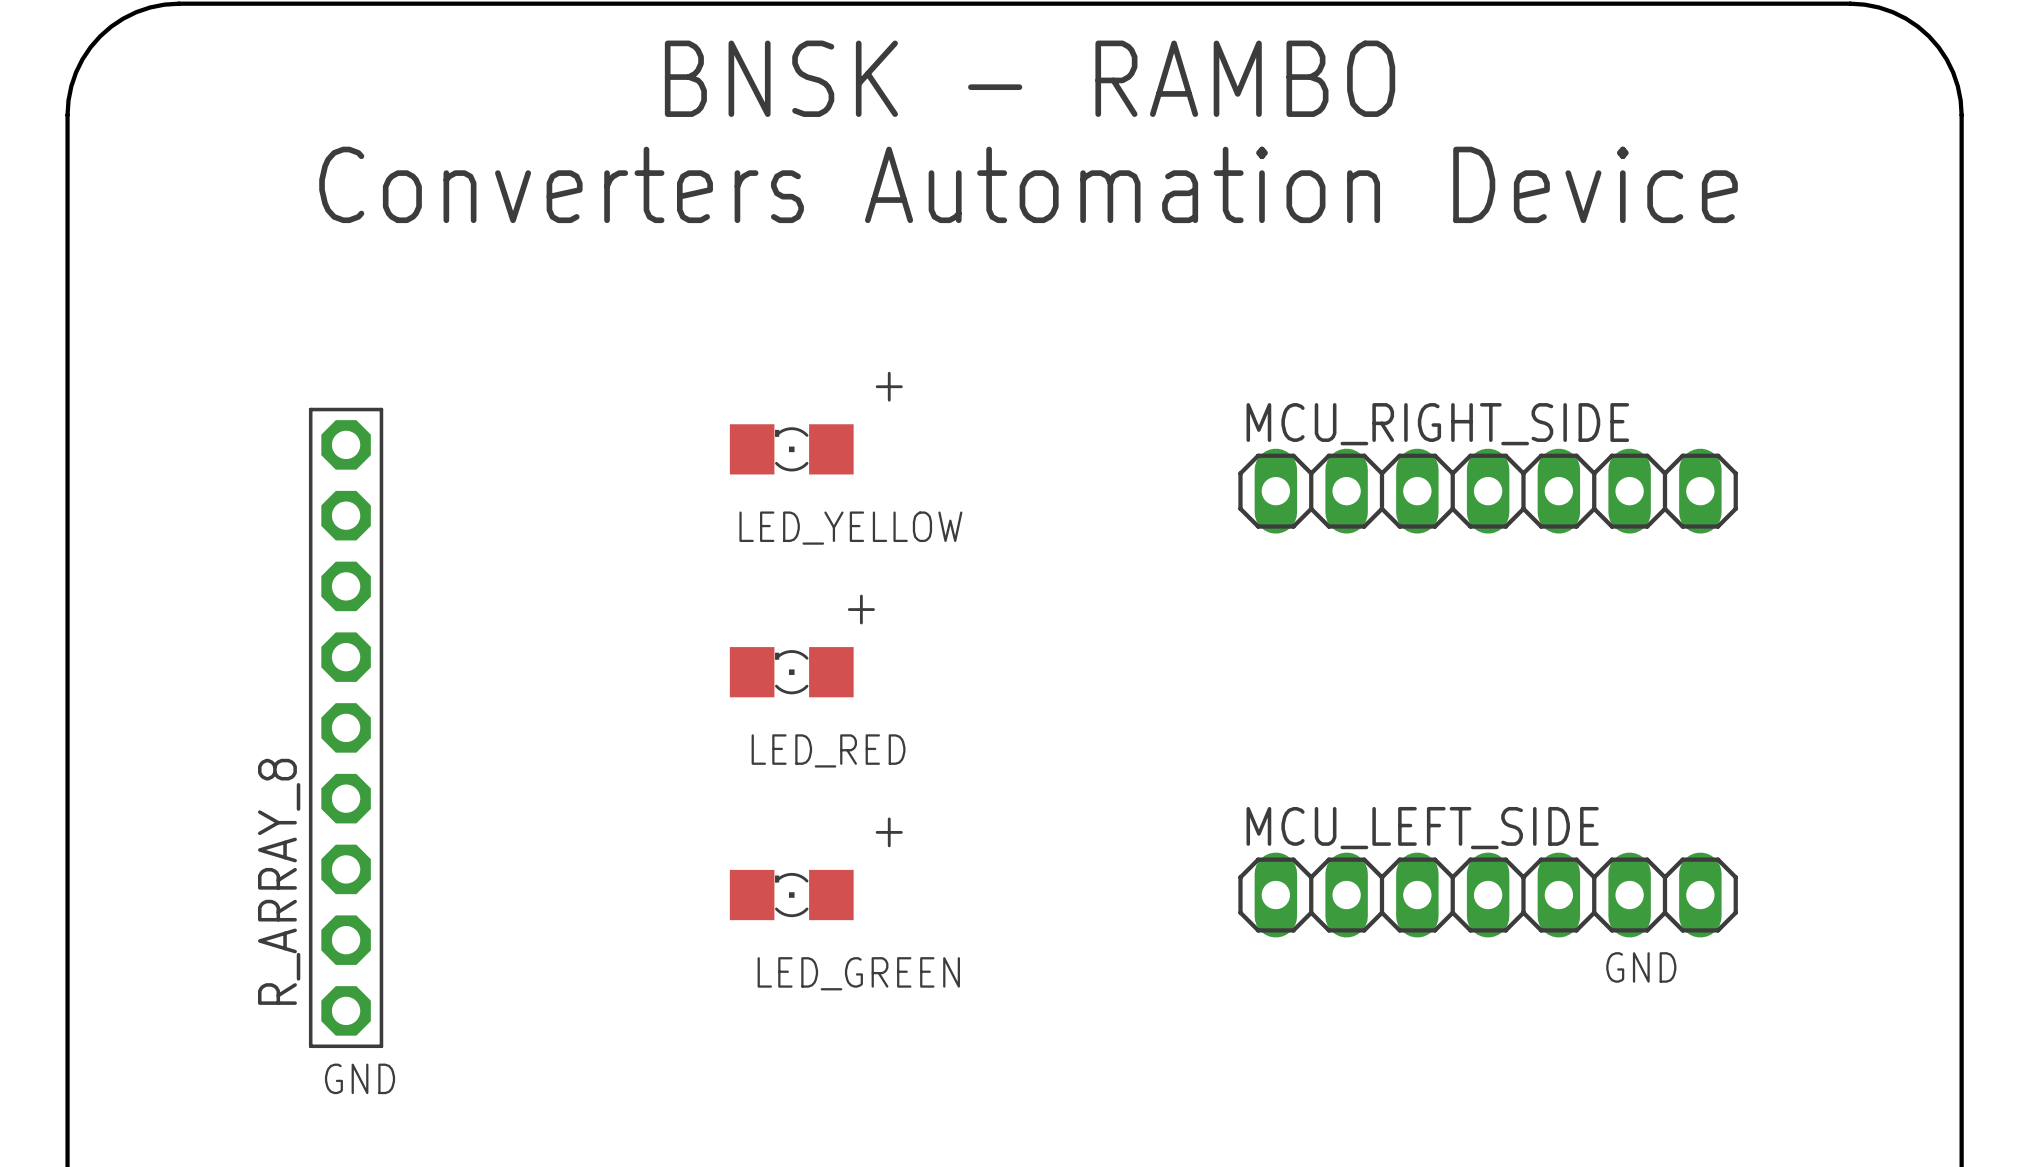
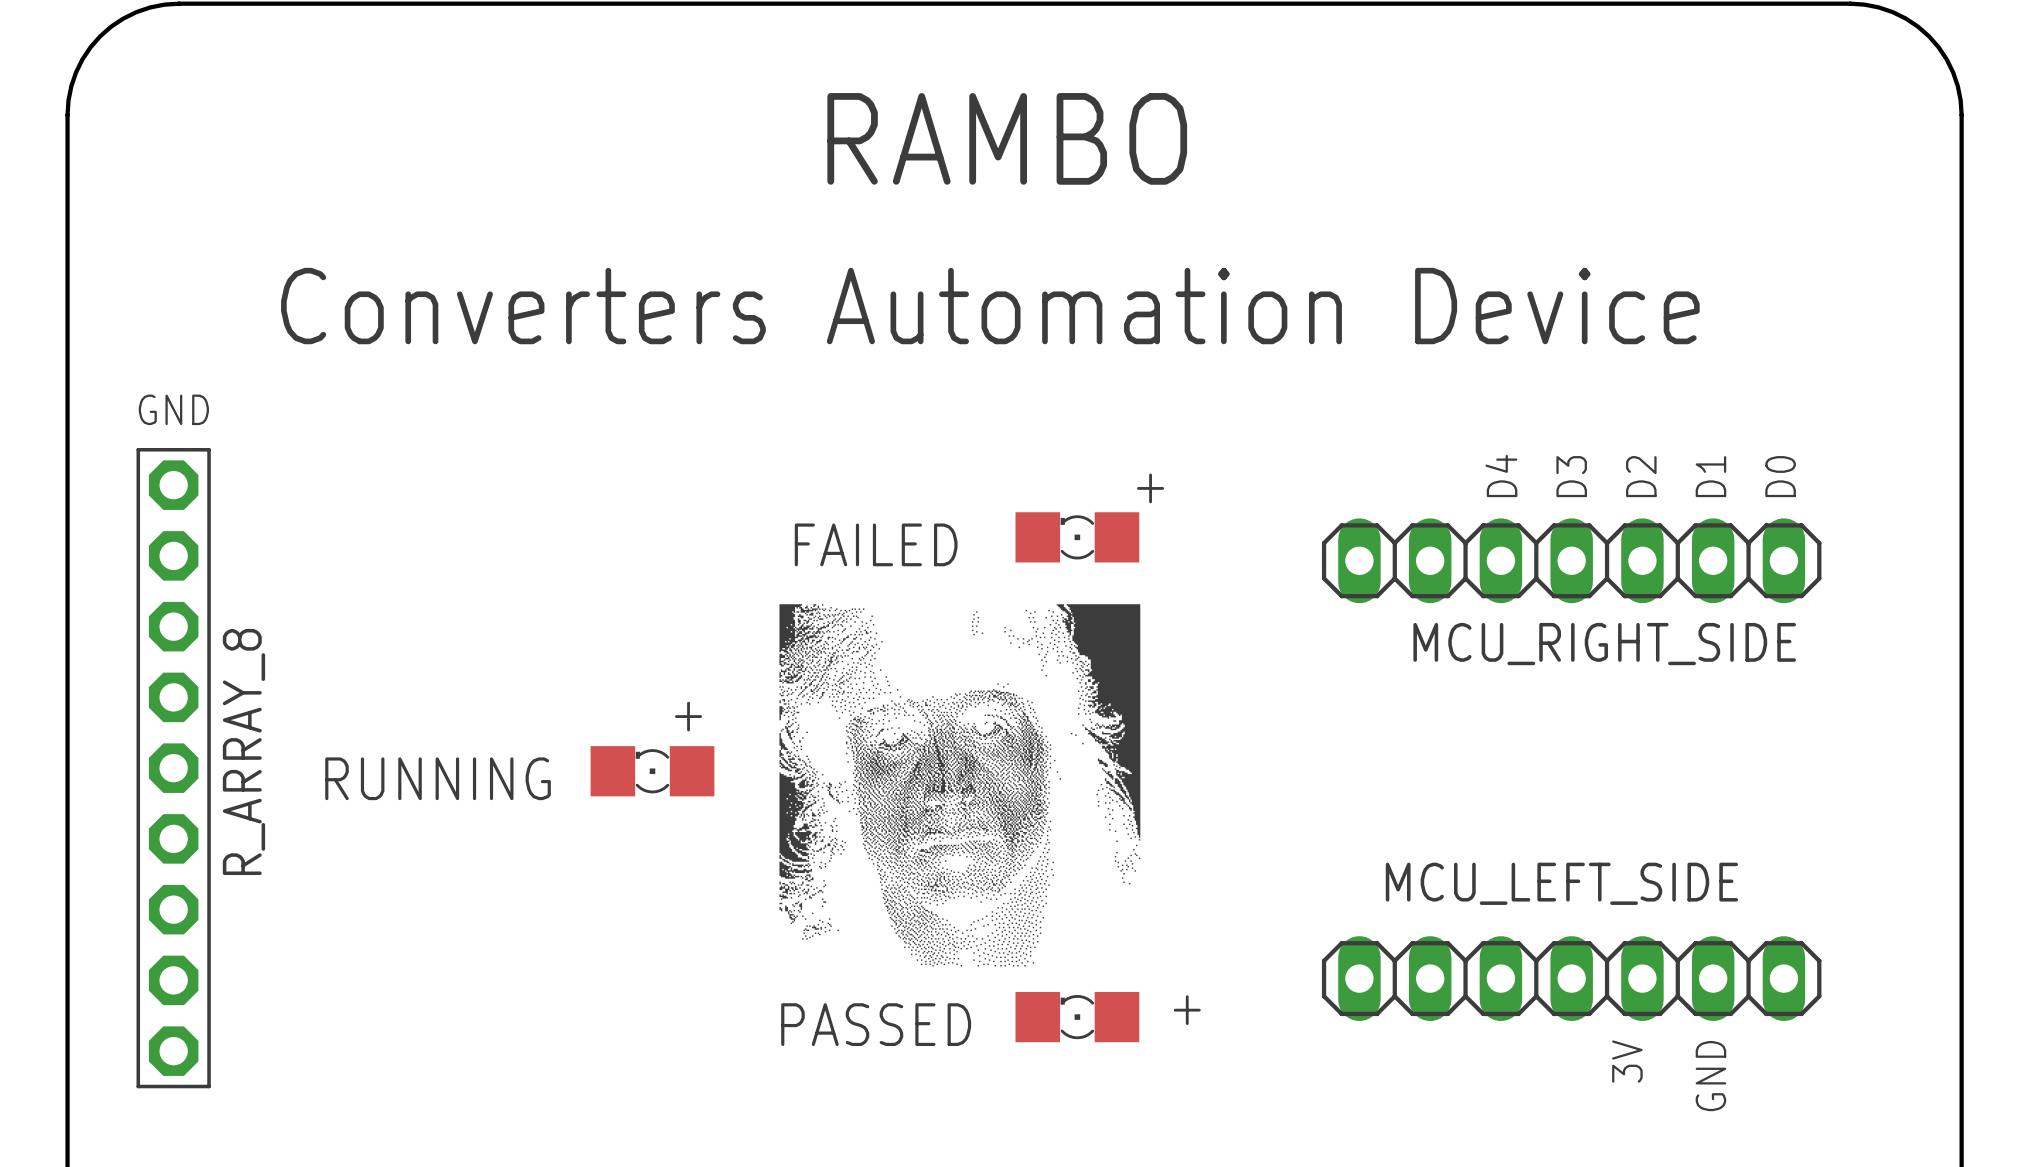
text: BNSK - RAMBO (1030, 78) -> none
text: none -> RAMBO (1007, 138)
text position: Converters Automation Device (1028, 184) -> Converters Automation Device (990, 306)
text: + (889, 386) -> none
text: none -> GND (173, 409)
MCU_RIGHT_SIDE name position: MCU_RIGHT_SIDE (1437, 424) -> MCU_RIGHT_SIDE (1604, 644)
LED_YELLOW: (791, 449) -> none
text: none -> D4 (1501, 476)
text: none -> D3 (1571, 476)
text: none -> D2 (1641, 476)
text: none -> D1 (1710, 476)
text: none -> D0 (1780, 476)
text: none -> + (1150, 488)
MCU_RIGHT_SIDE position: (1488, 491) -> (1571, 560)
FAILED: none -> (1077, 537)
drawing: none -> [779, 604, 1141, 967]
text: + (861, 609) -> none
LED_RED: (791, 672) -> none
text: none -> + (688, 716)
R_ARRAY_8 position: (346, 727) -> (173, 768)
RUNNING: none -> (652, 771)
MCU_LEFT_SIDE name position: MCU_LEFT_SIDE (1422, 828) -> MCU_LEFT_SIDE (1561, 883)
text: + (889, 832) -> none
R_ARRAY_8 name position: R_ARRAY_8 (279, 881) -> R_ARRAY_8 (243, 751)
LED_GREEN: (791, 895) -> none
MCU_LEFT_SIDE position: (1488, 895) -> (1571, 978)
text rotation: 0° (1641, 967) -> 90° counterclockwise (1710, 1076)
text position: GND (1641, 967) -> GND (1710, 1076)
text: none -> + (1187, 1010)
PASSED: none -> (1077, 1017)
text: none -> 3V (1627, 1061)
text: GND (360, 1078) -> none

